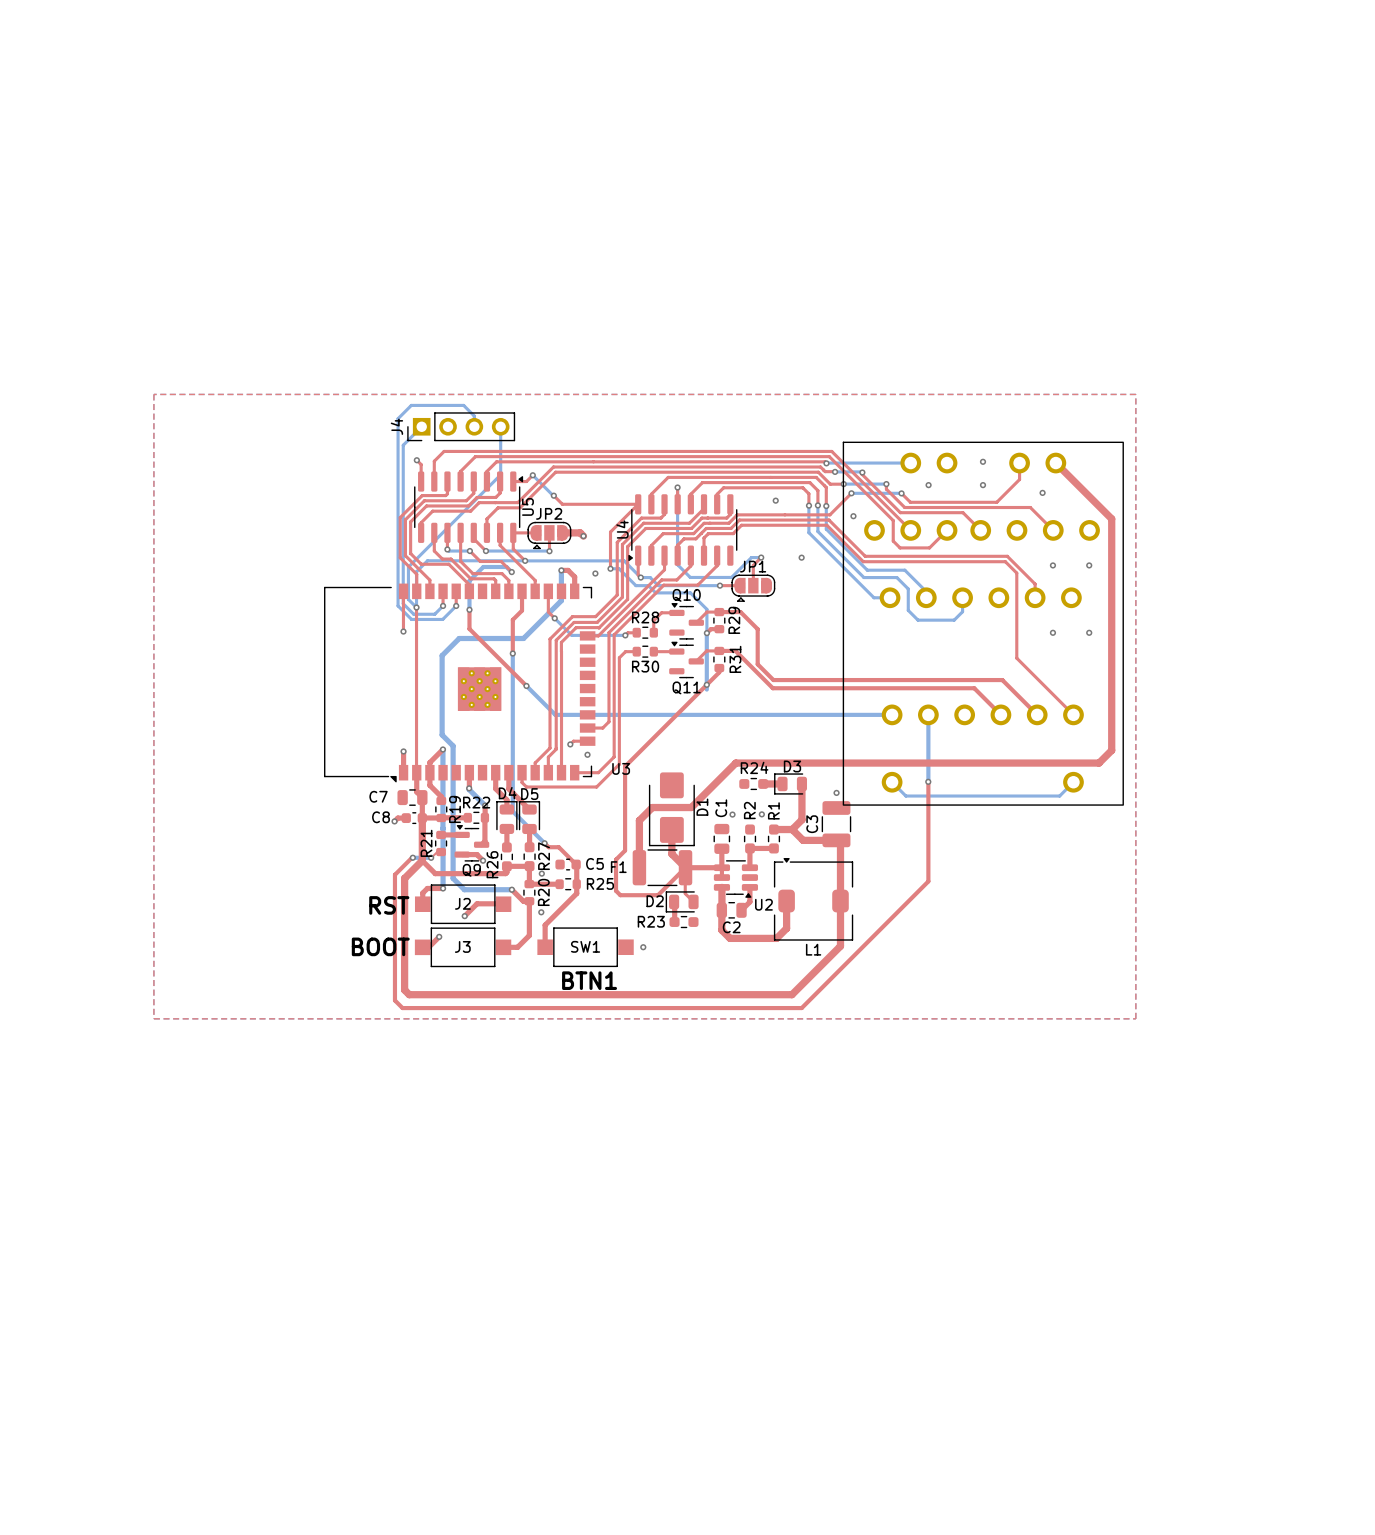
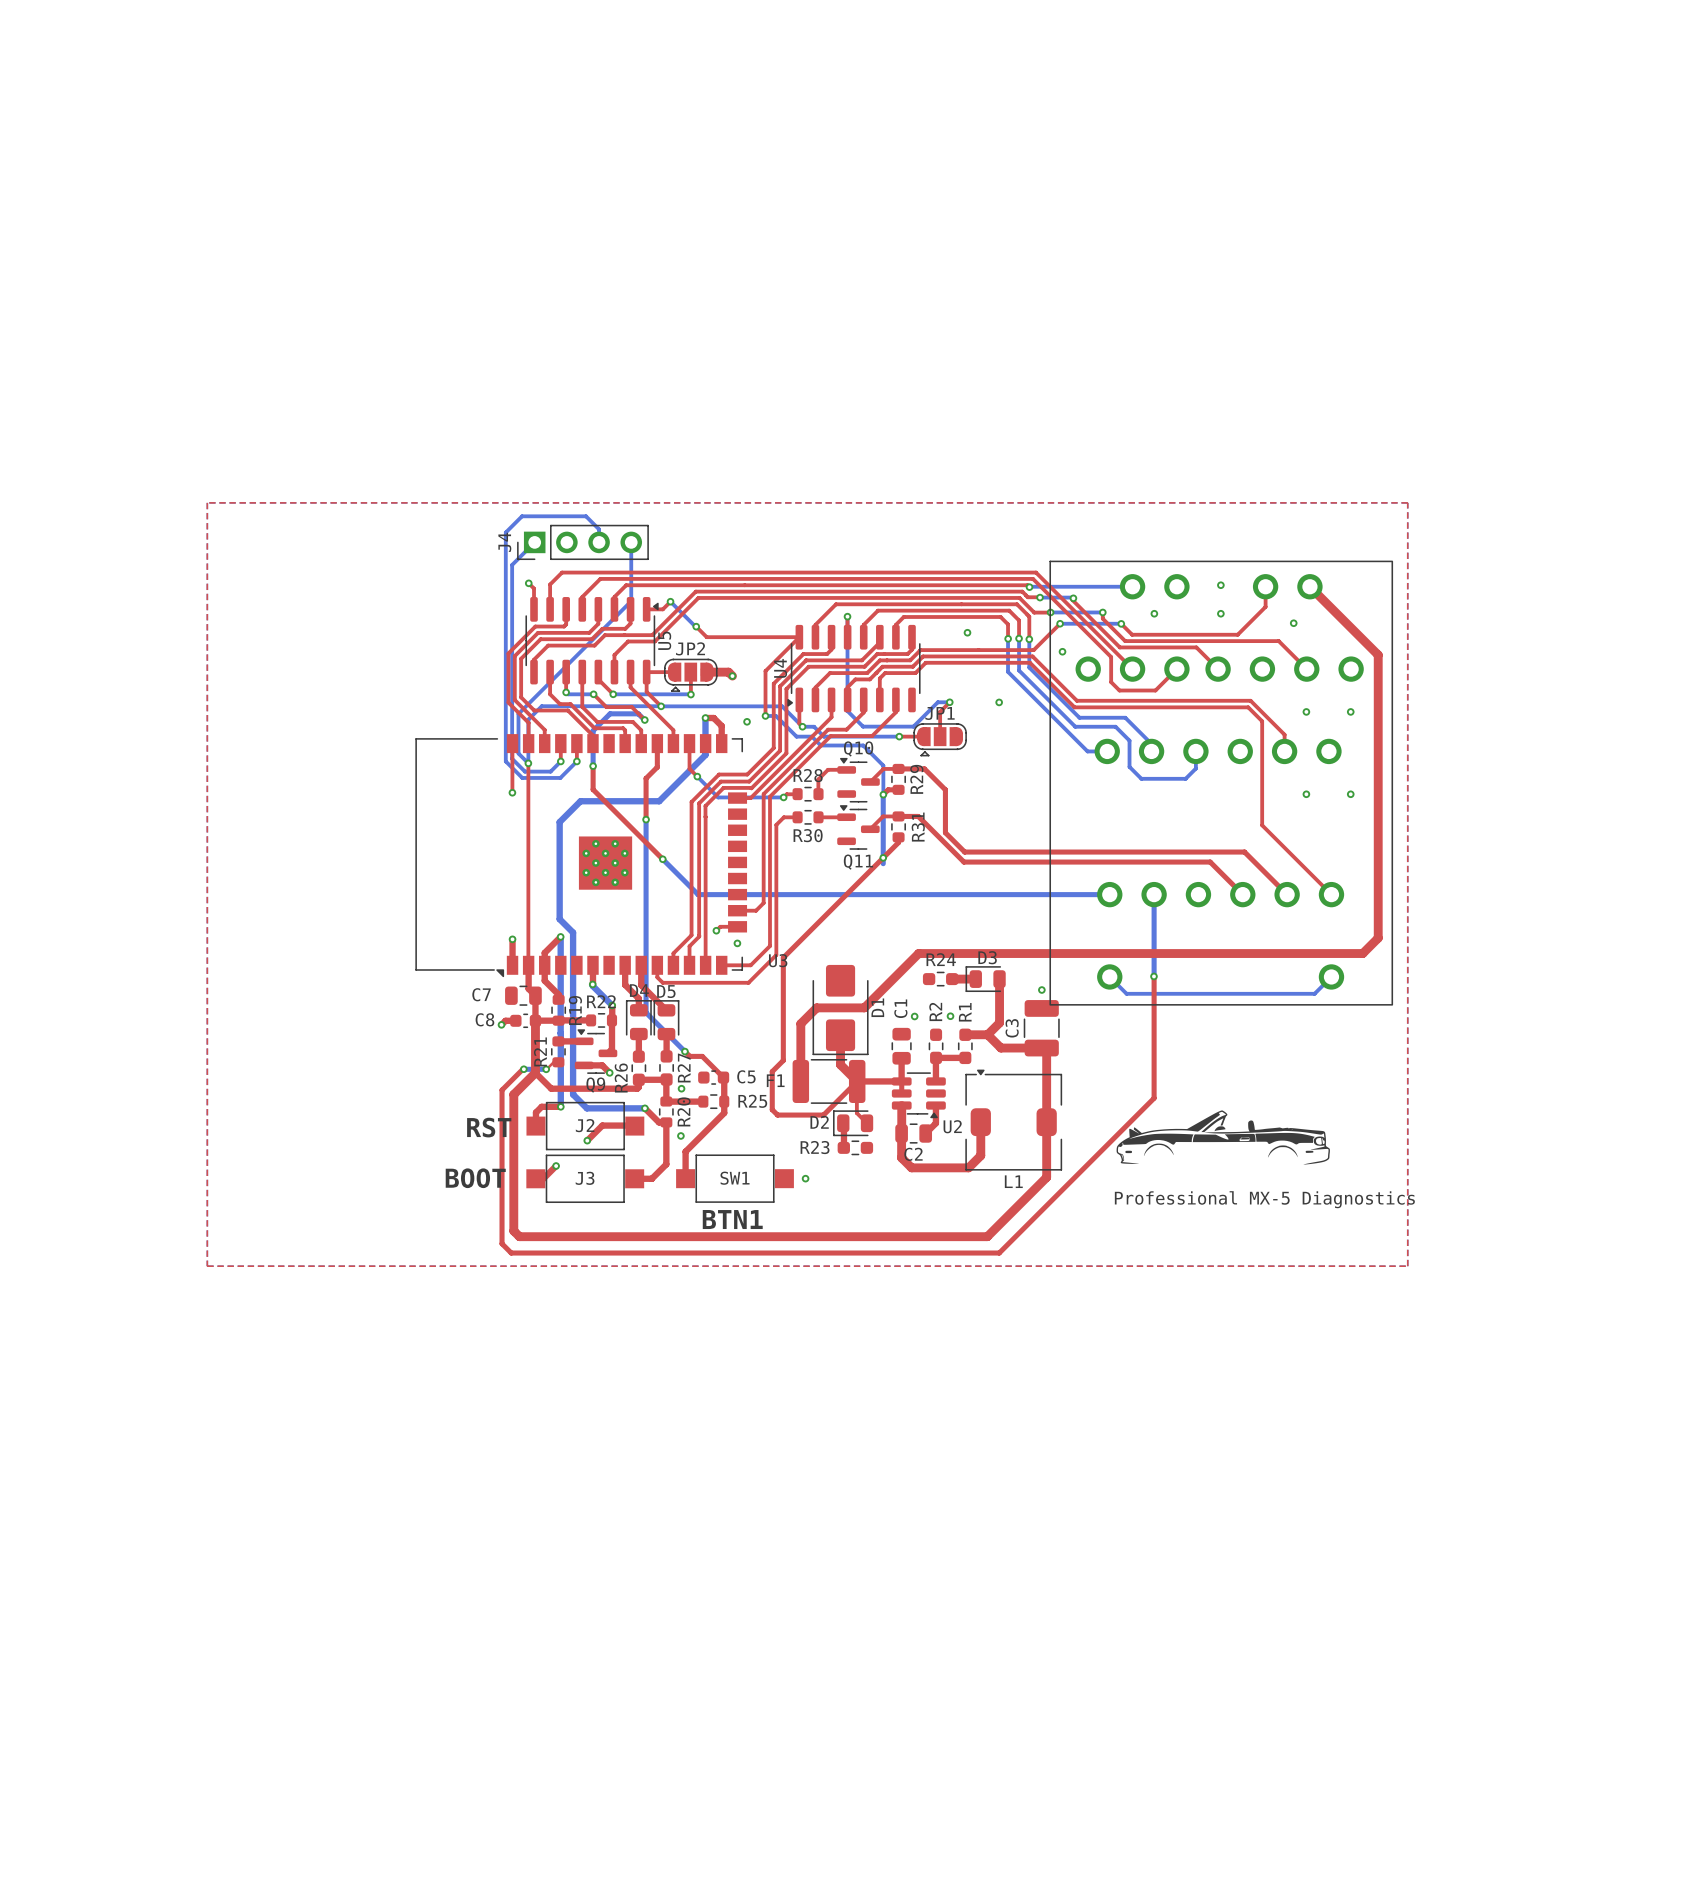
drawing: none -> [1116, 1110, 1330, 1165]
text: none -> Professional MX-5 Diagnostics (1264, 1199)

